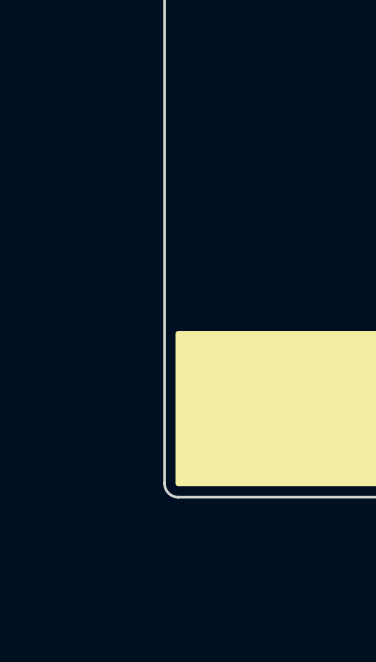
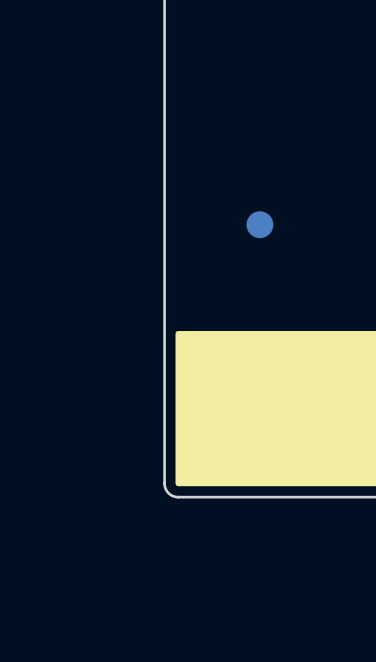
part: none -> (259, 224)

